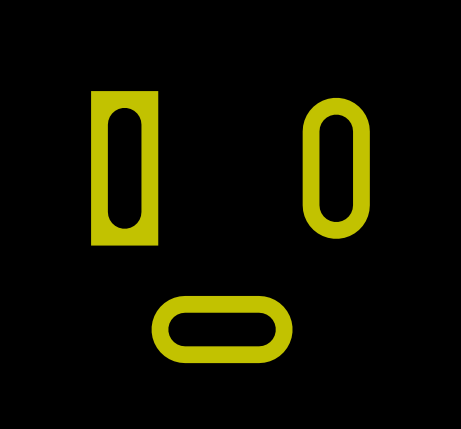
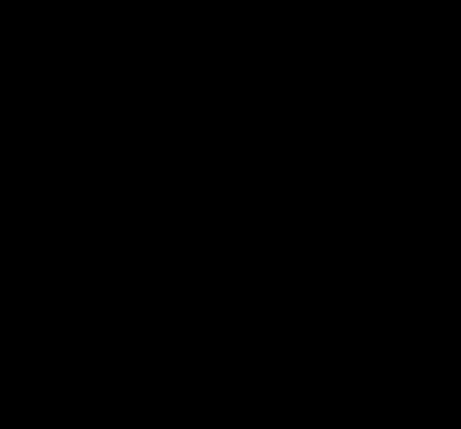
part: (230, 227) -> none

